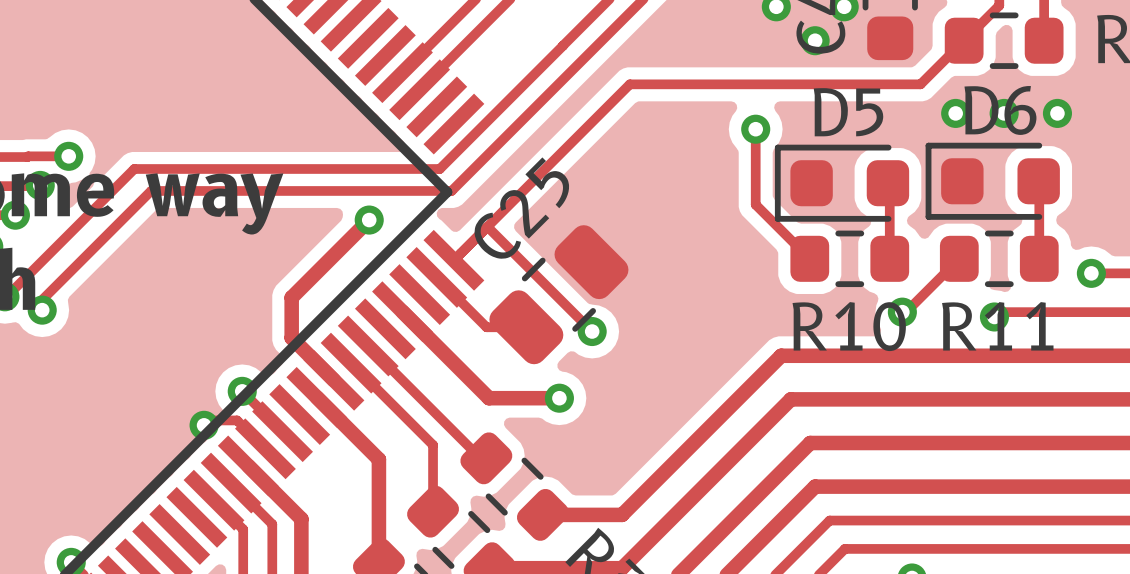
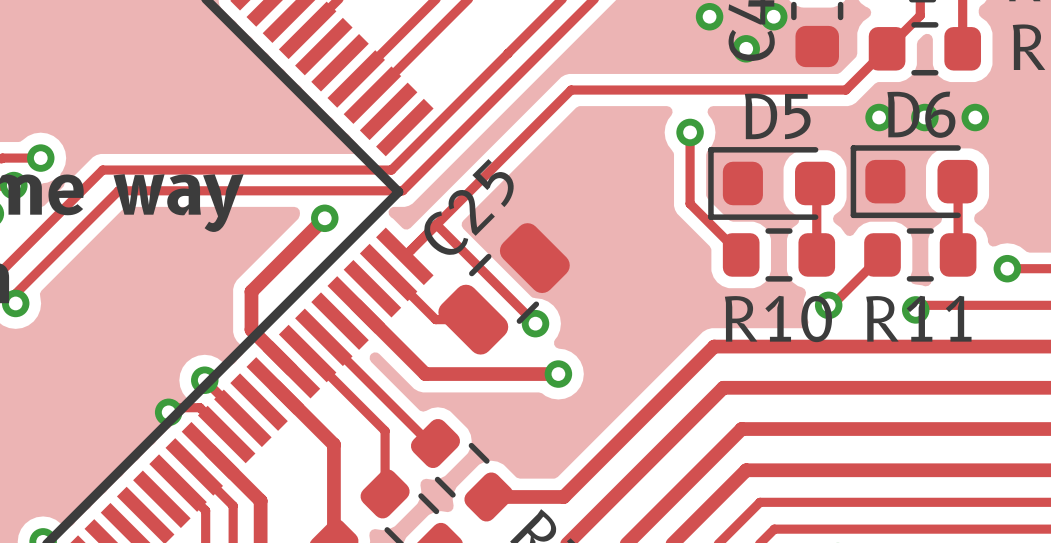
track: (475, 384) (489, 398) (559, 398) -> (425, 374) (558, 374)
via position: (559, 398) -> (558, 374)

